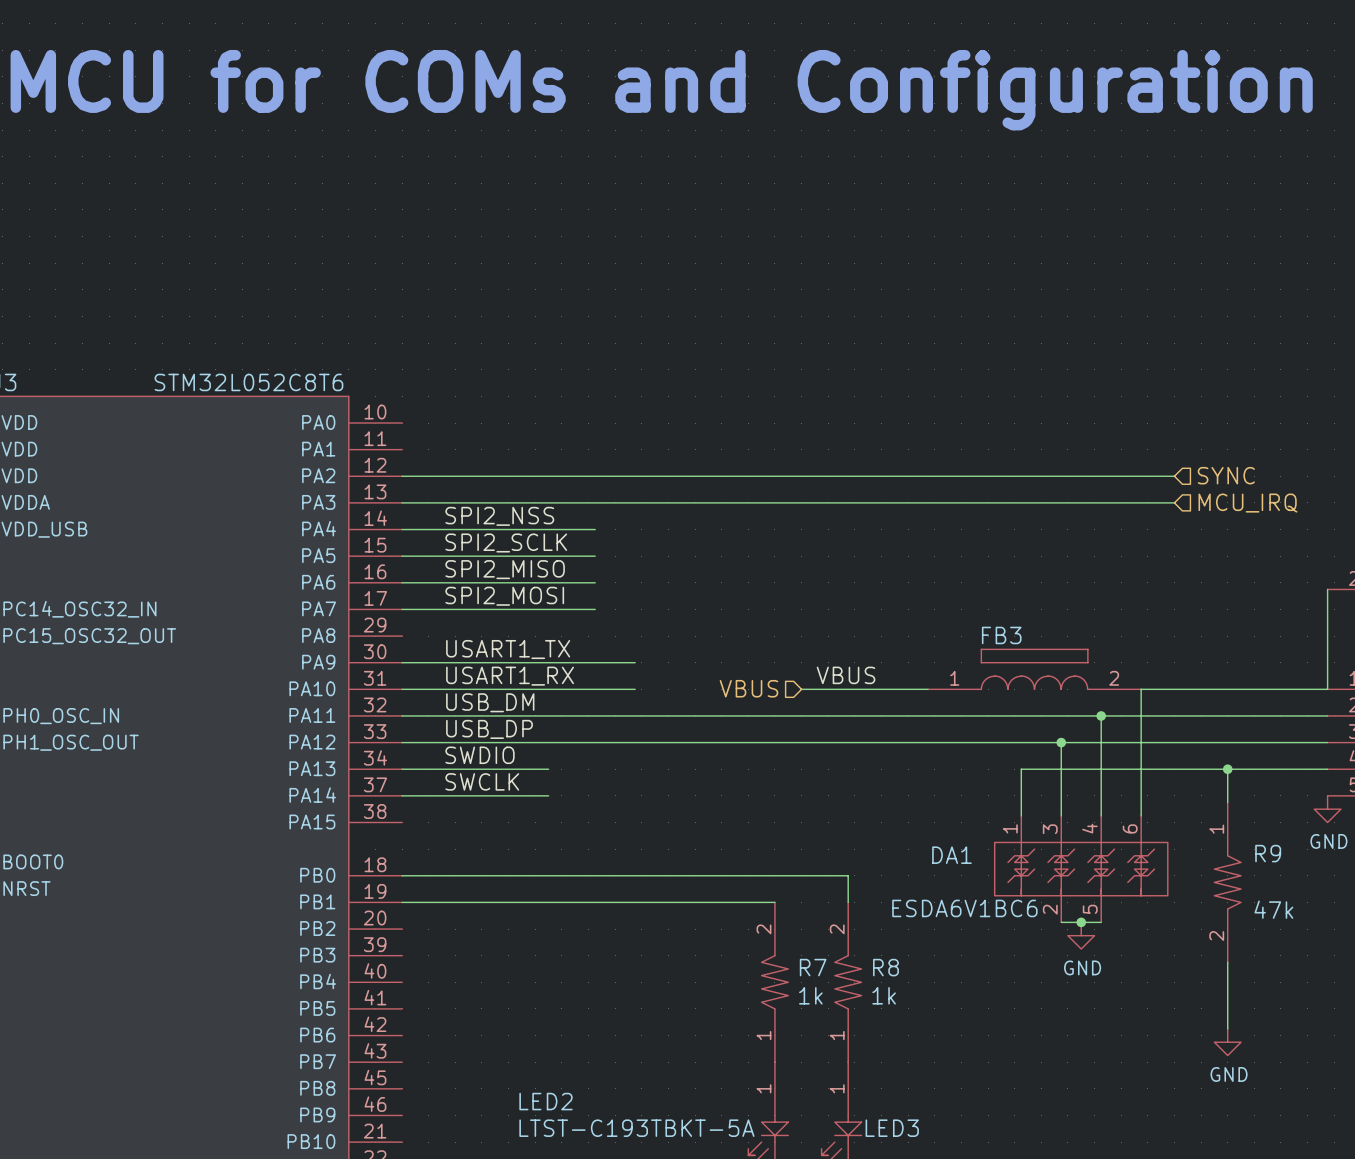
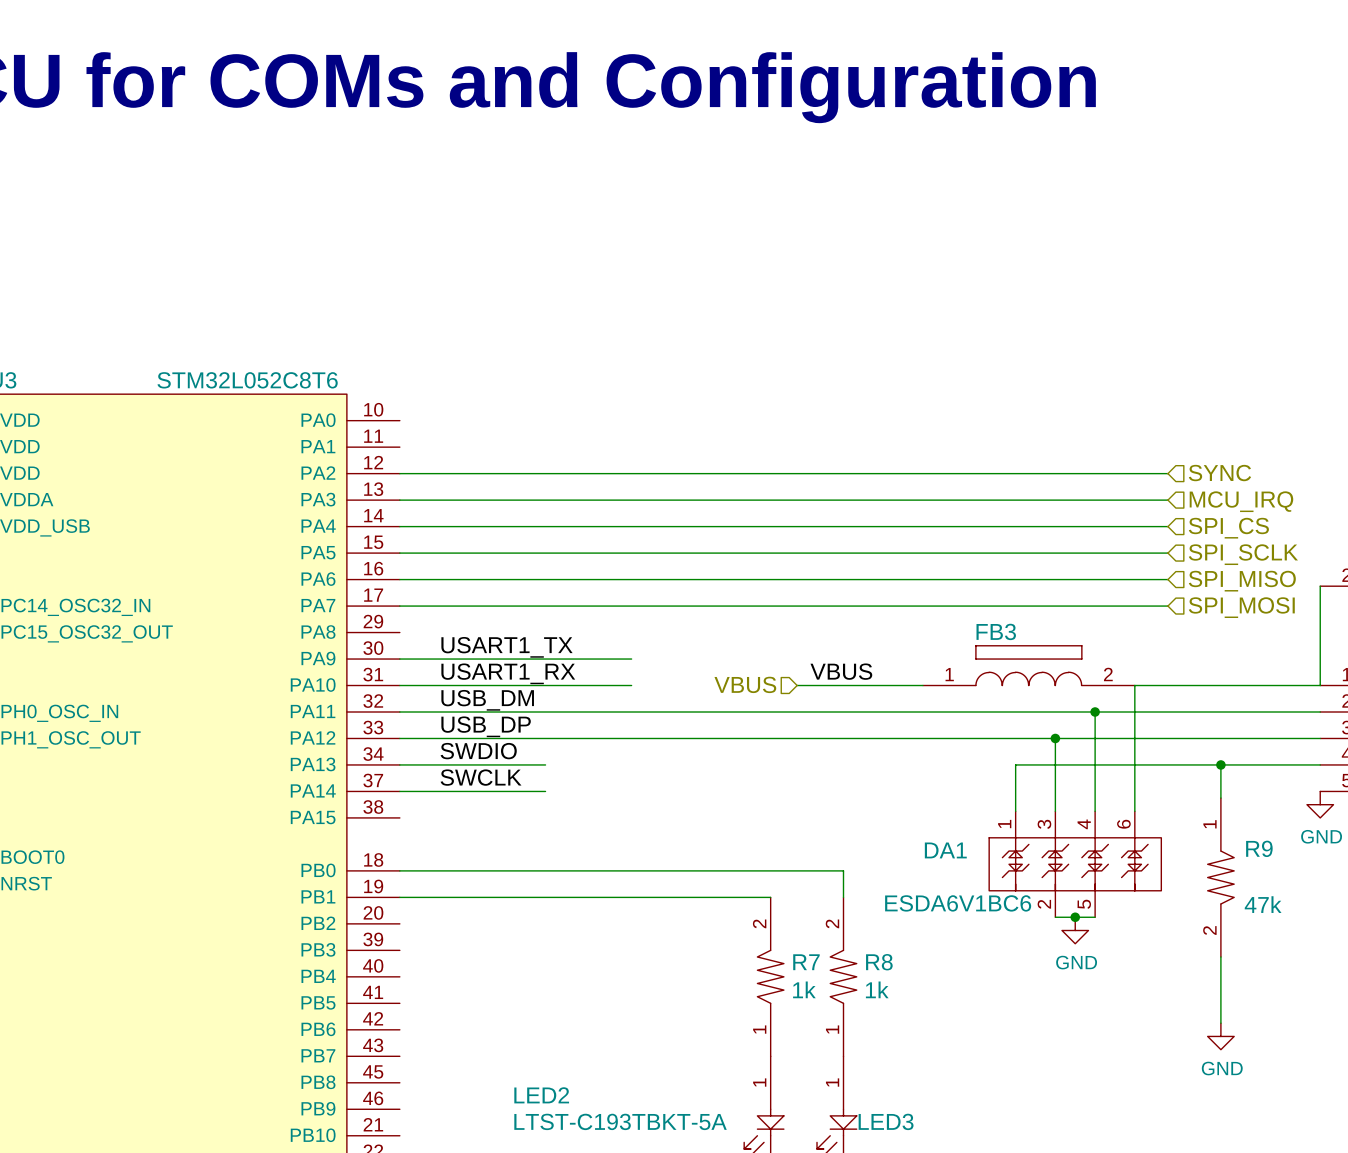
label: SPI2_NSS (499, 516) -> none
wire: none -> (591, 526) (1167, 526)
hierarchical label: none -> SPI_CS (1228, 528)
label: SPI2_SCLK (506, 542) -> none
wire: none -> (591, 553) (1167, 553)
hierarchical label: none -> SPI_SCLK (1243, 554)
label: SPI2_MISO (505, 569) -> none
wire: none -> (591, 579) (1167, 579)
hierarchical label: none -> SPI_MISO (1242, 581)
label: SPI2_MOSI (504, 596) -> none
wire: none -> (591, 606) (1167, 606)
hierarchical label: none -> SPI_MOSI (1241, 607)

